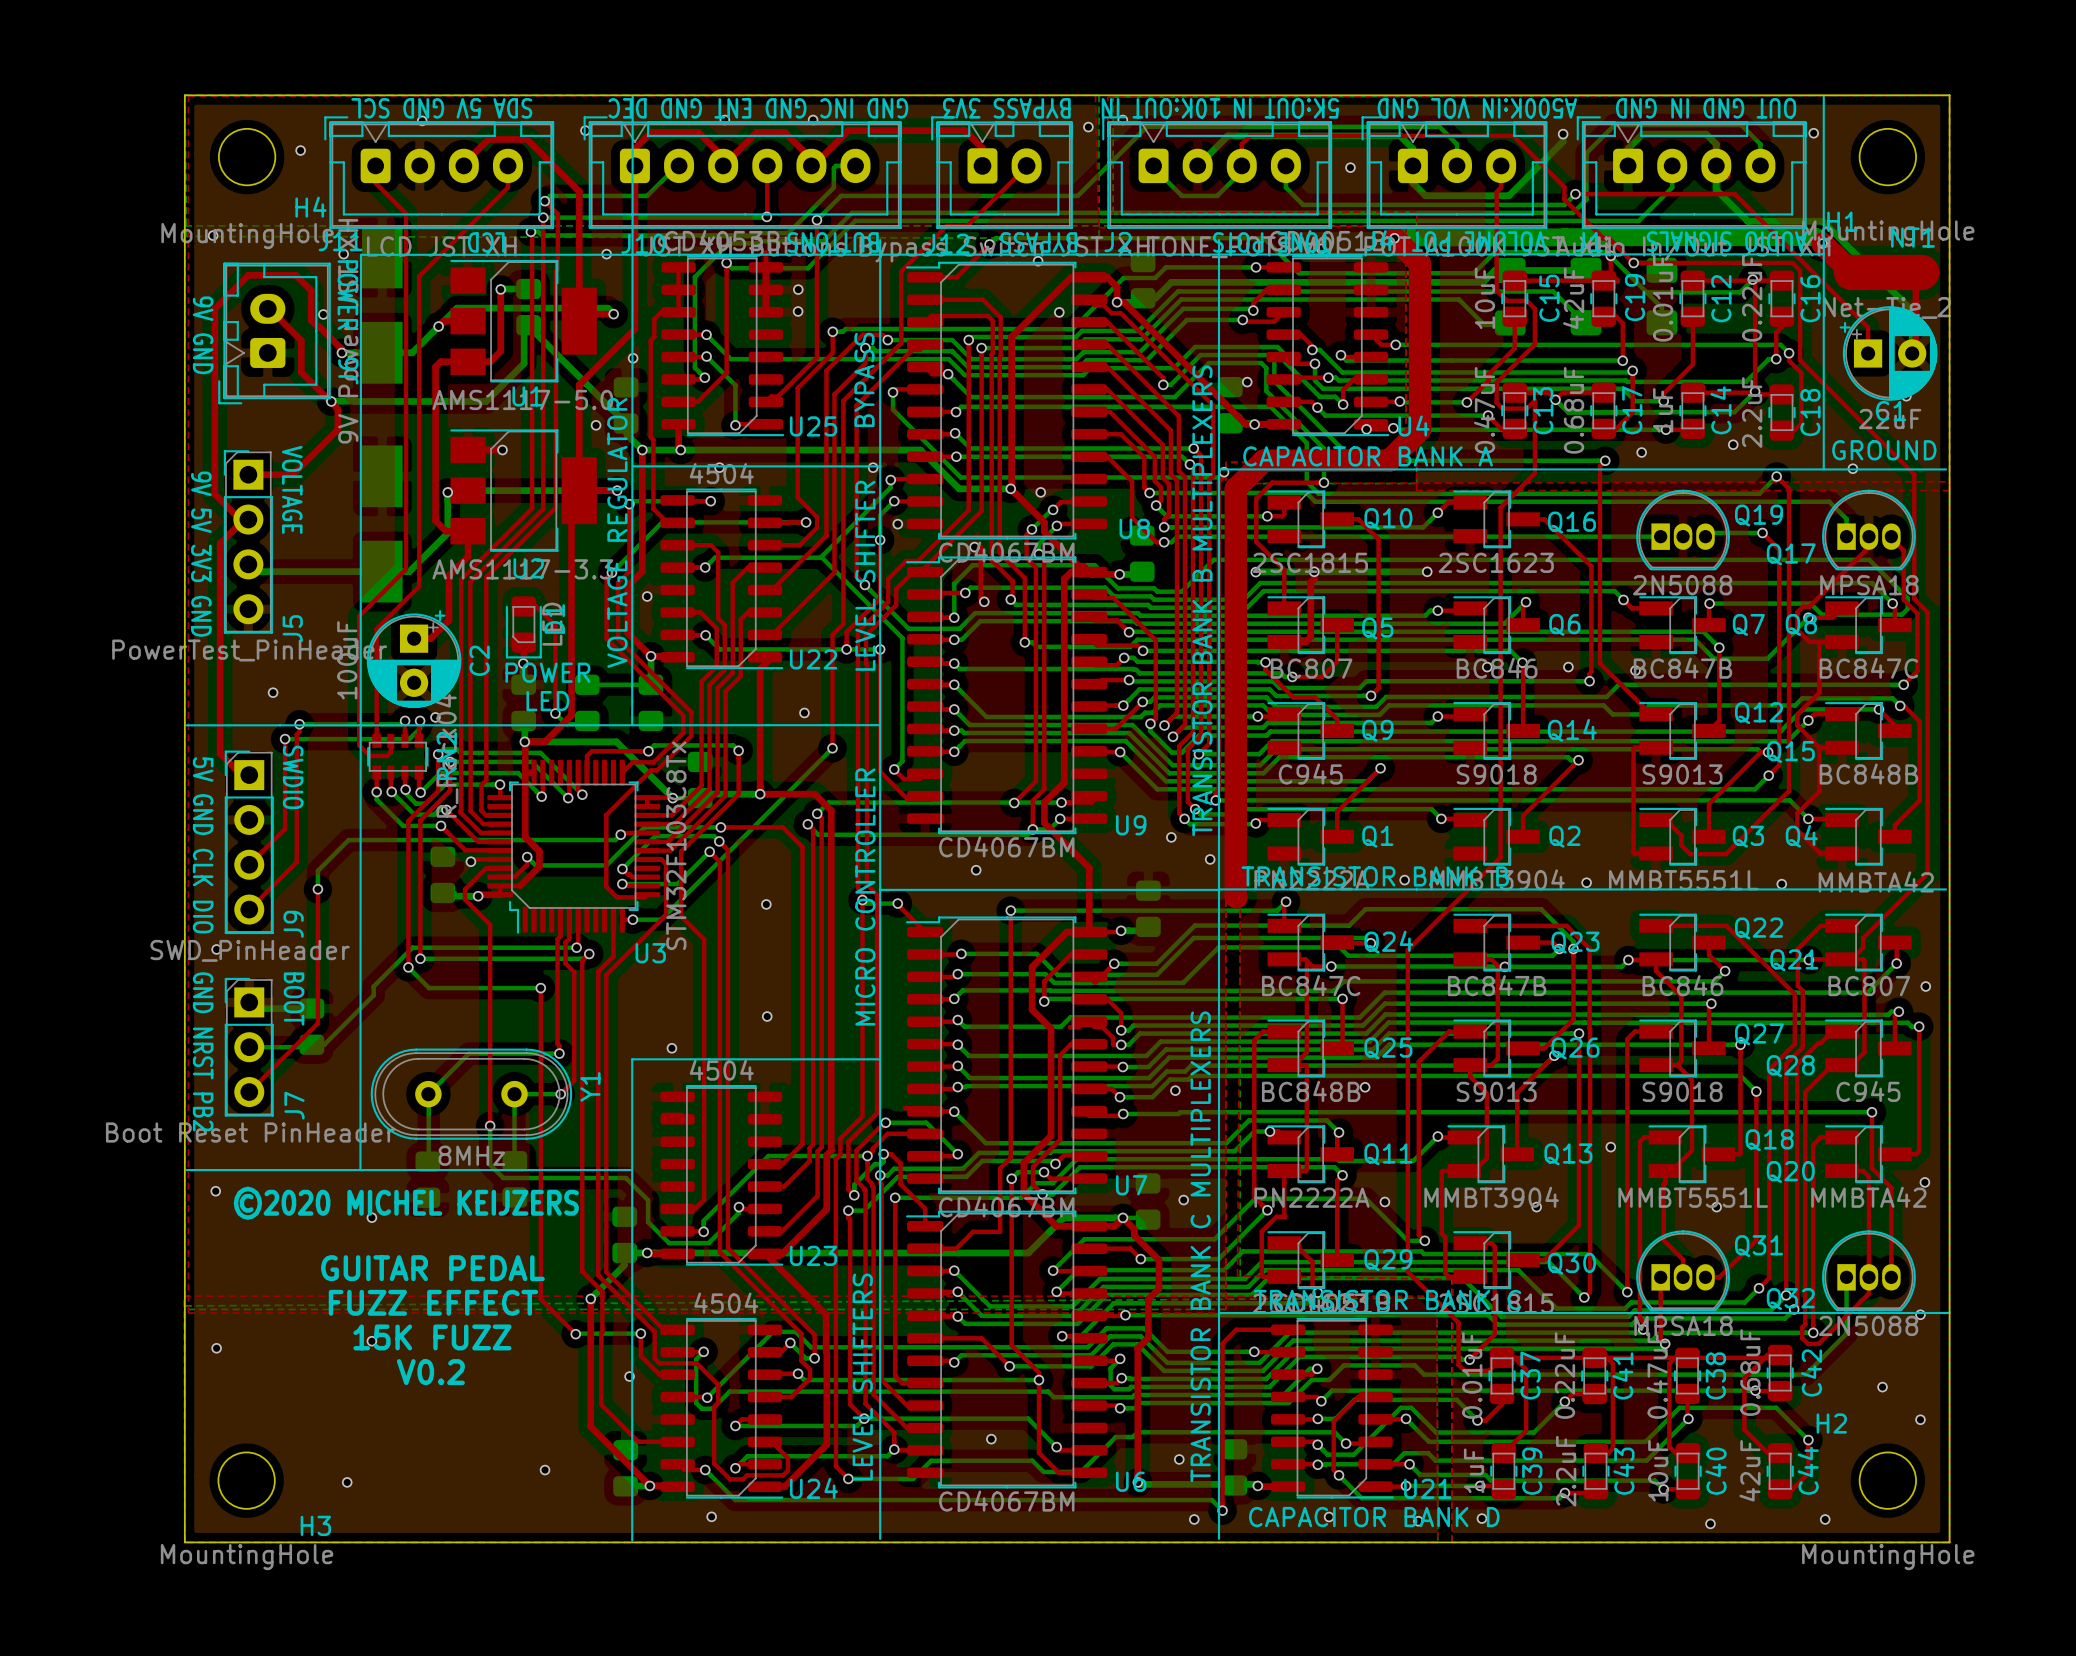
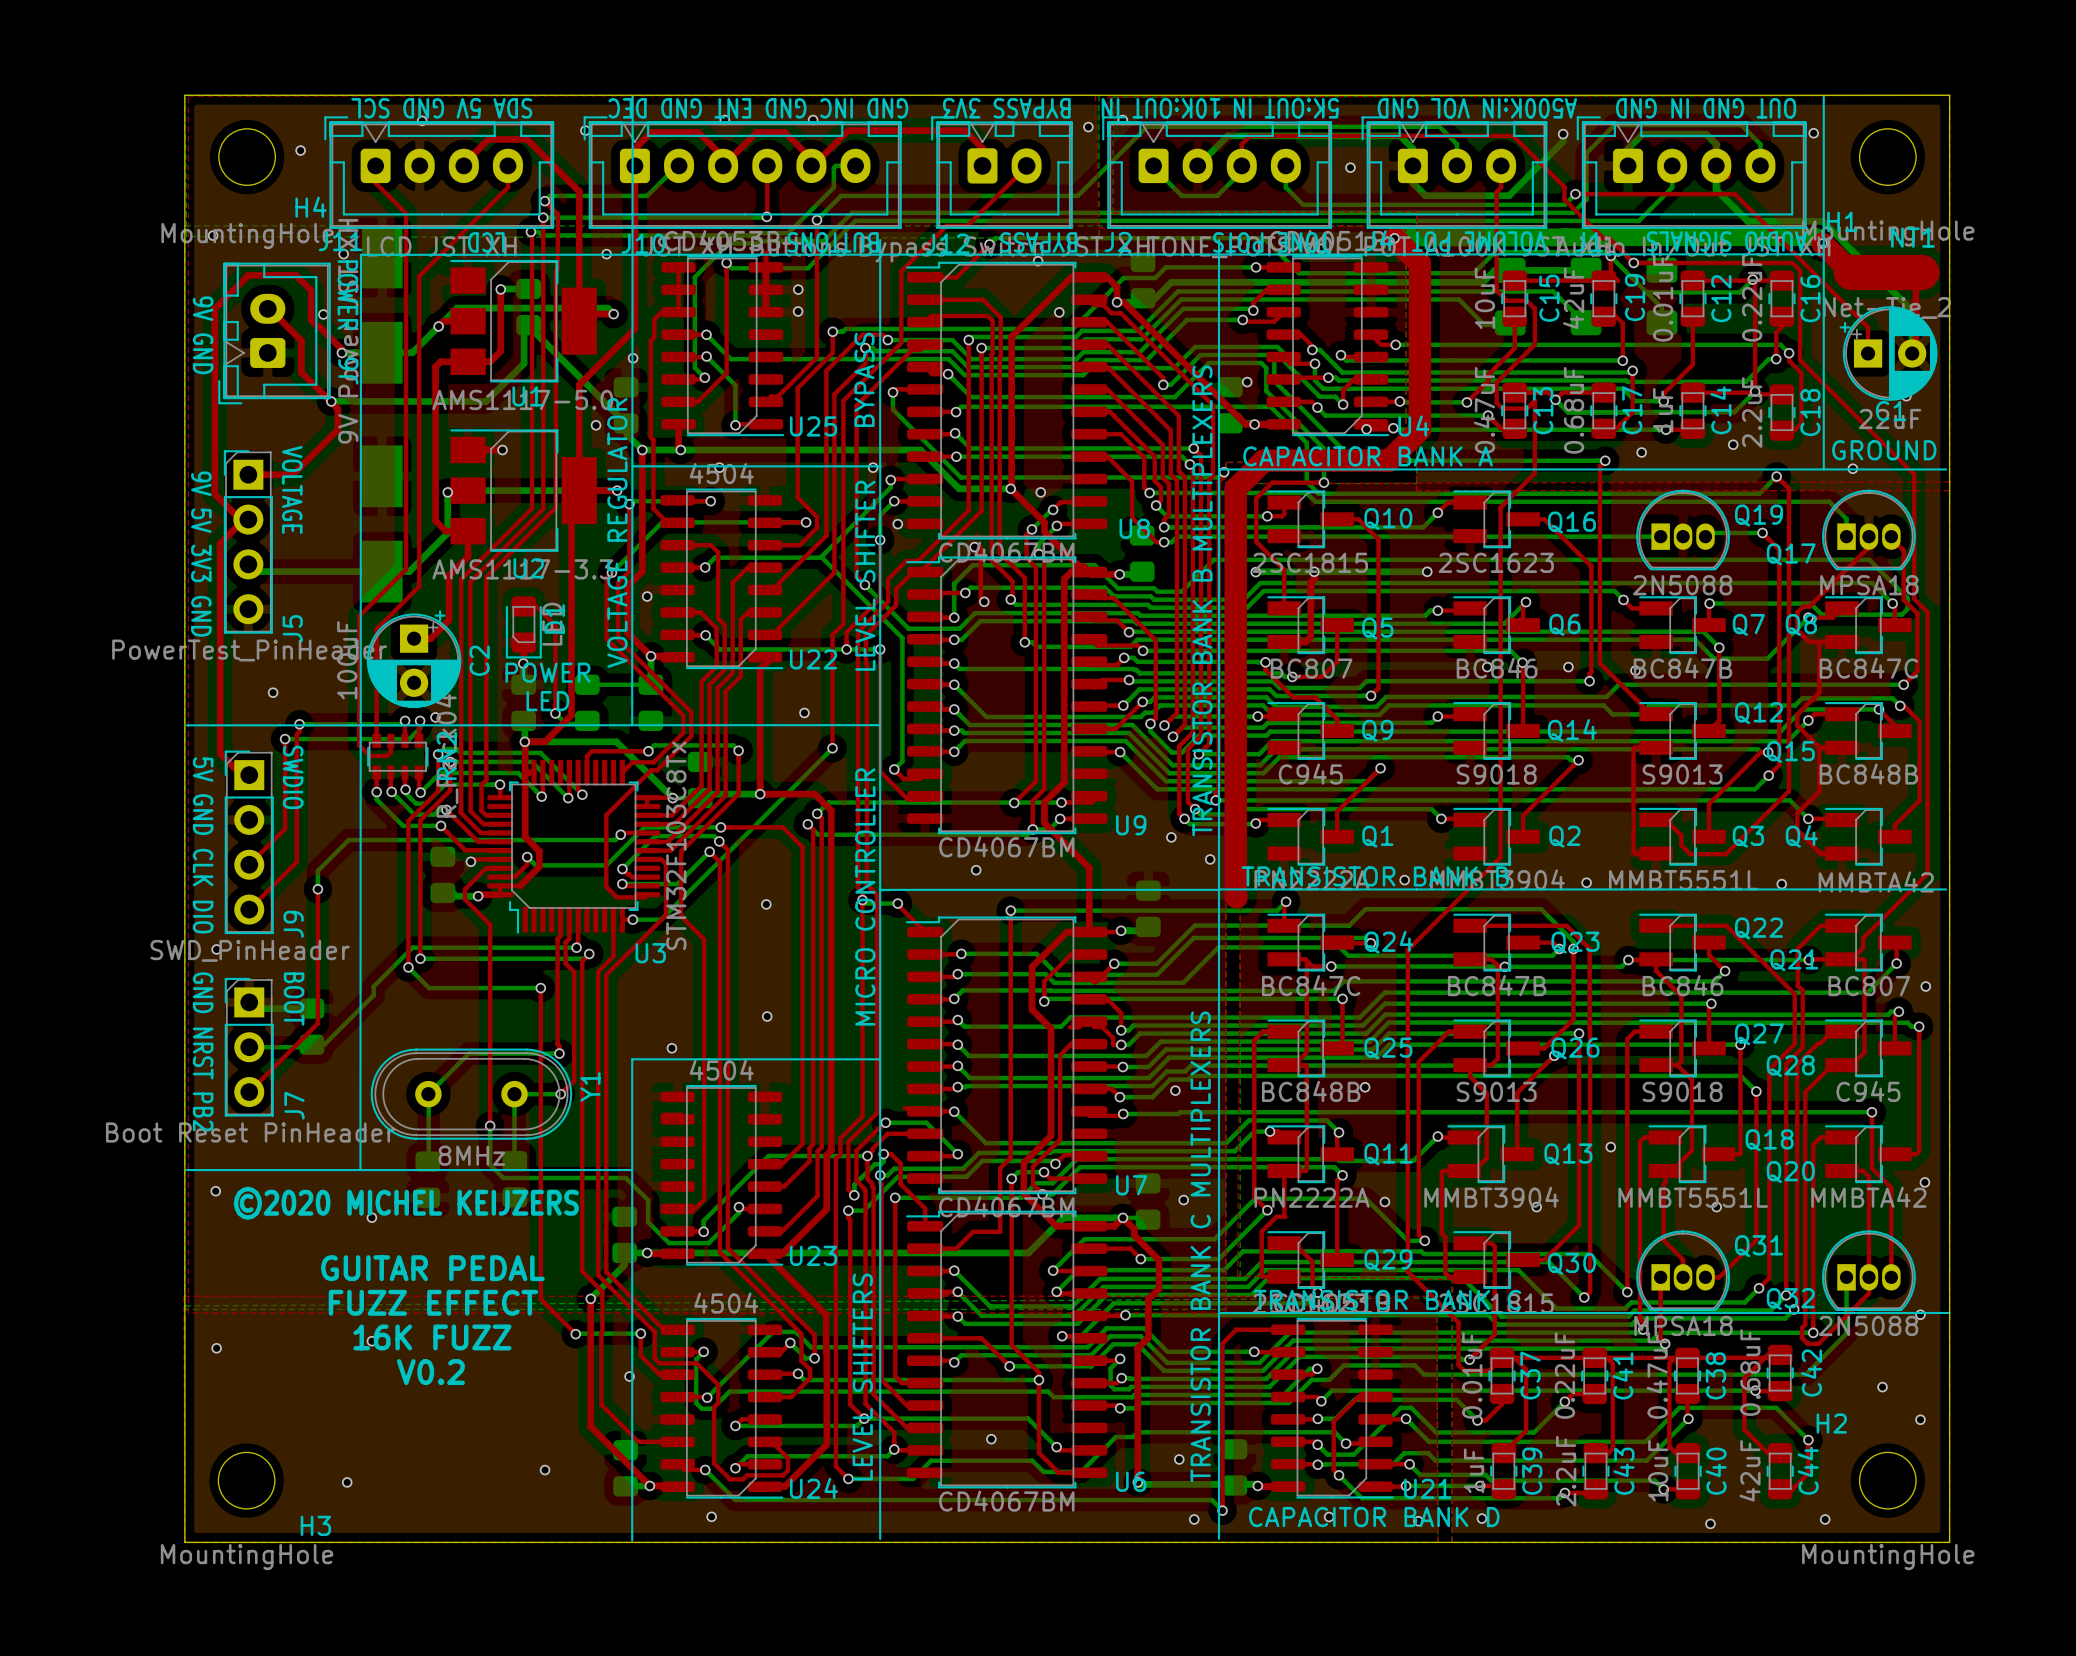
text: 15K FUZZ (432, 1337) -> 16K FUZZ (432, 1337)

